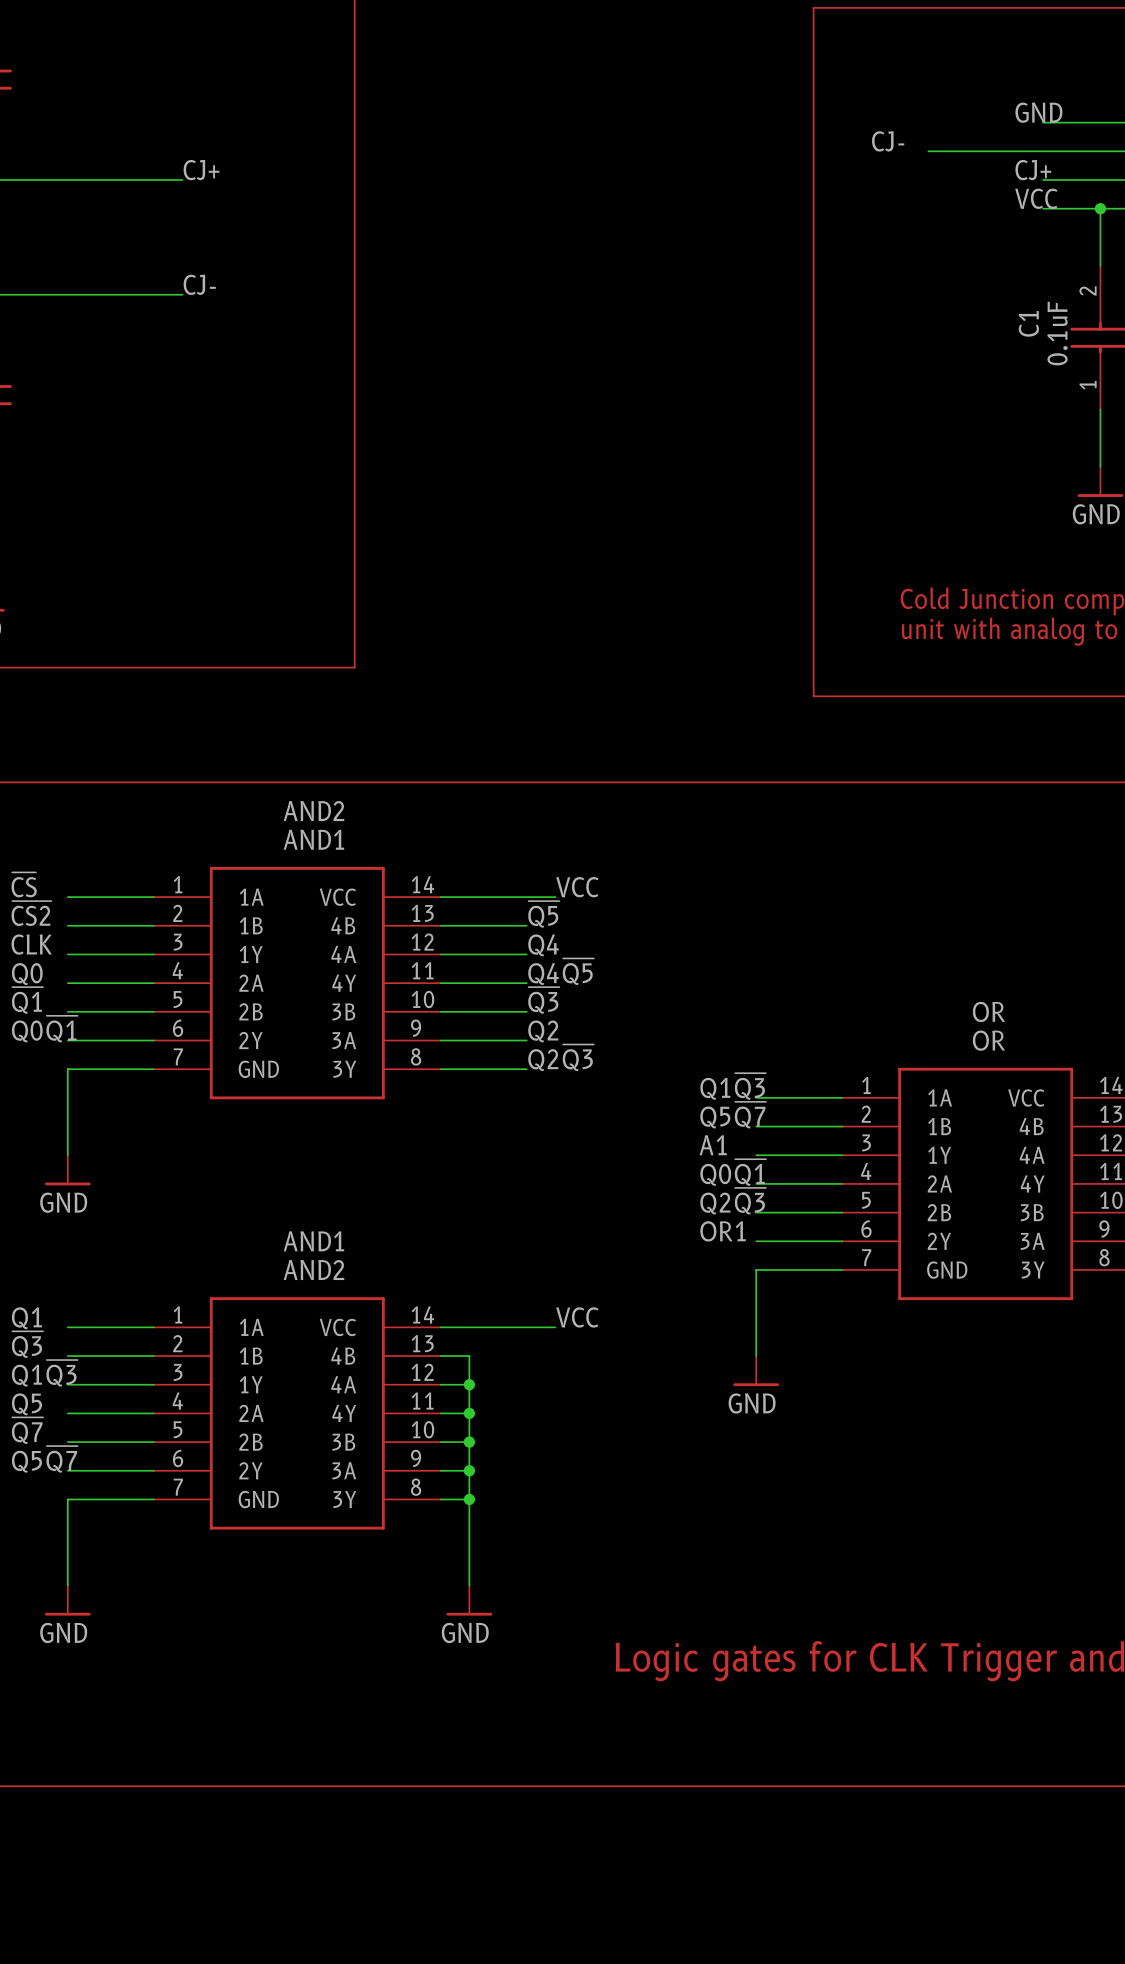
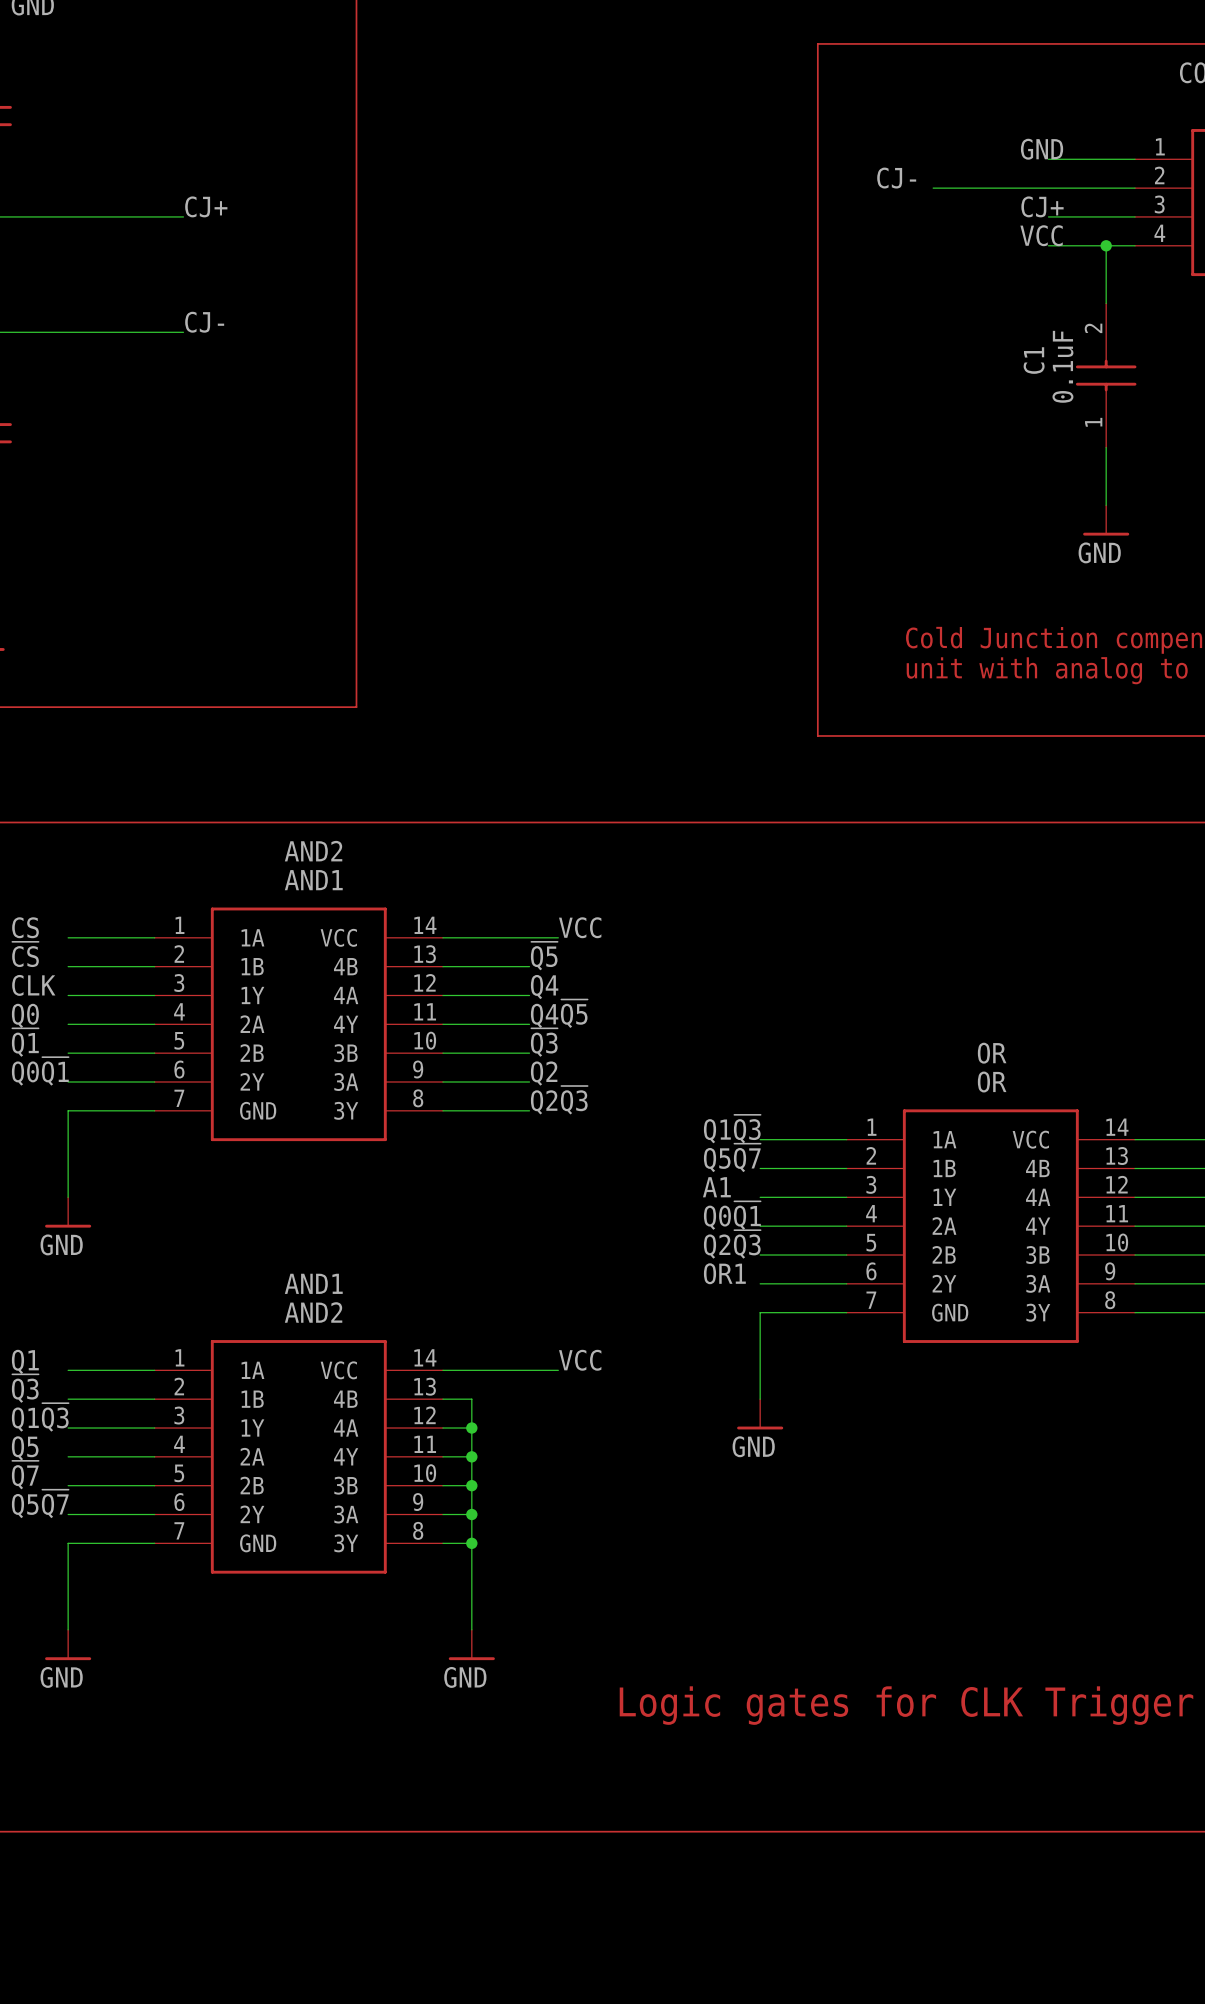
label: ~{CS} (24, 884) -> CS (25, 927)
label: ~{CS2} (31, 913) -> ~{CS} (25, 954)

